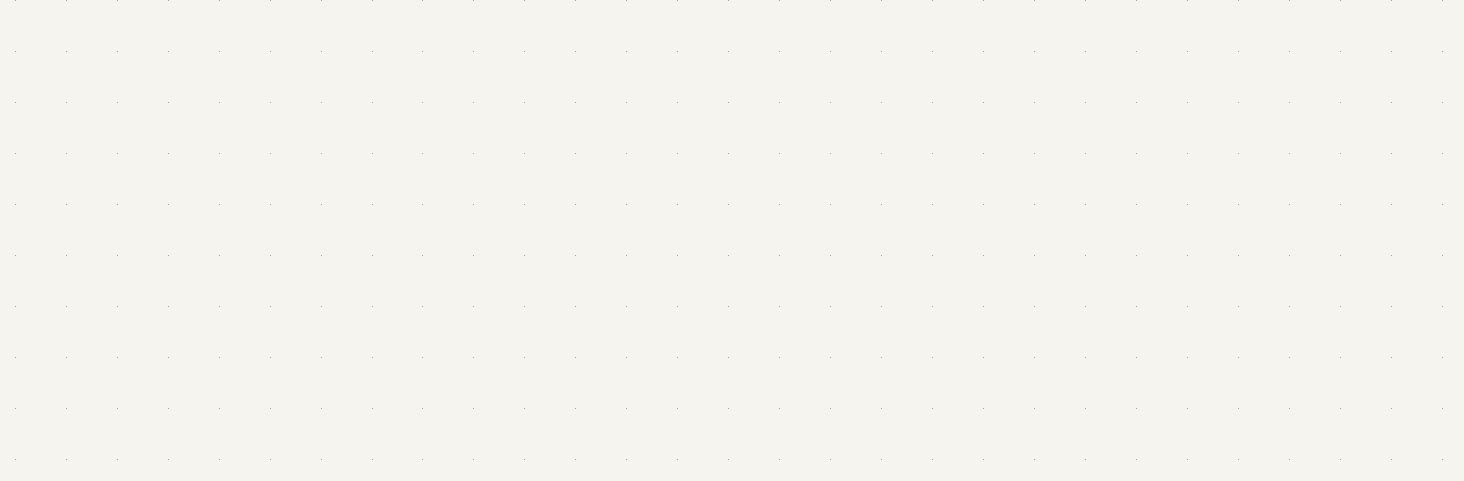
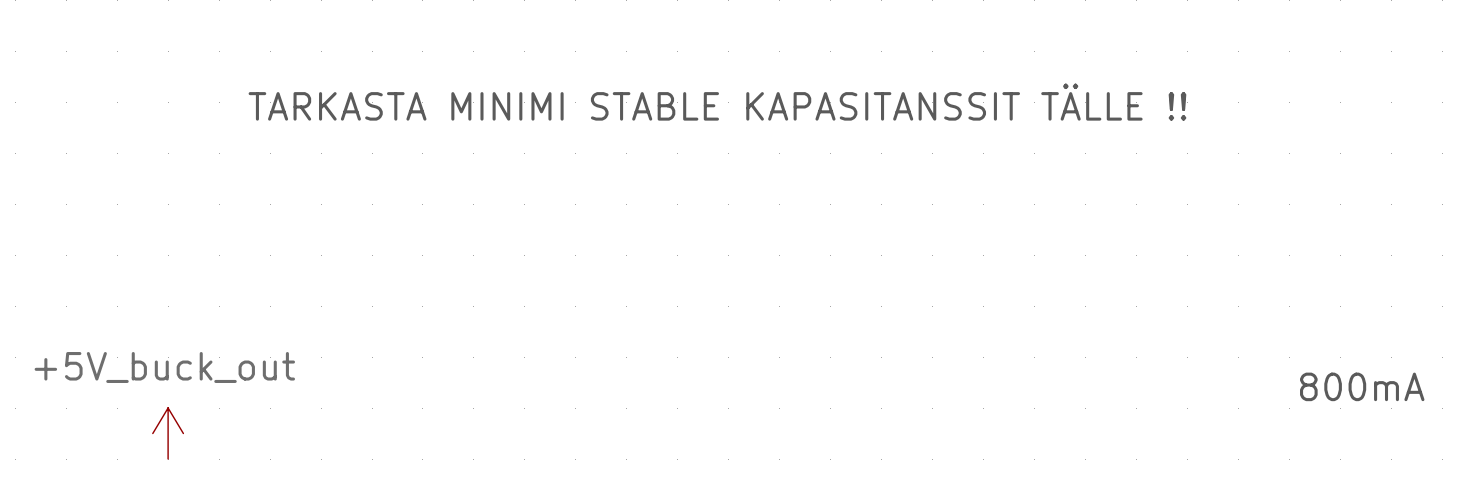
text: none -> TARKASTA MINIMI STABLE KAPASITANSSIT TÄLLE !! (717, 102)
text: none -> 800mA (1362, 386)
power symbol: none -> +5V_buck_out (168, 433)

